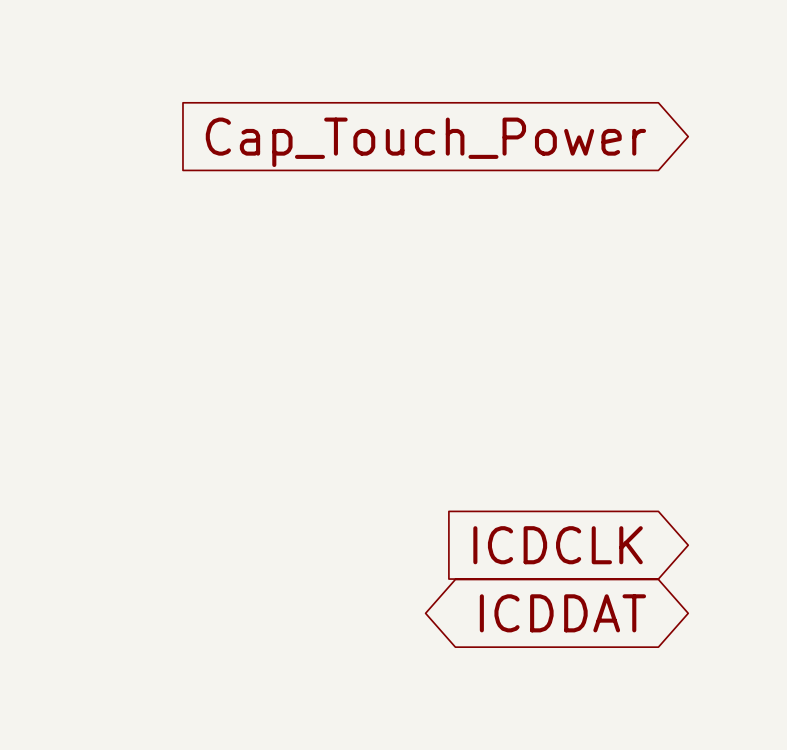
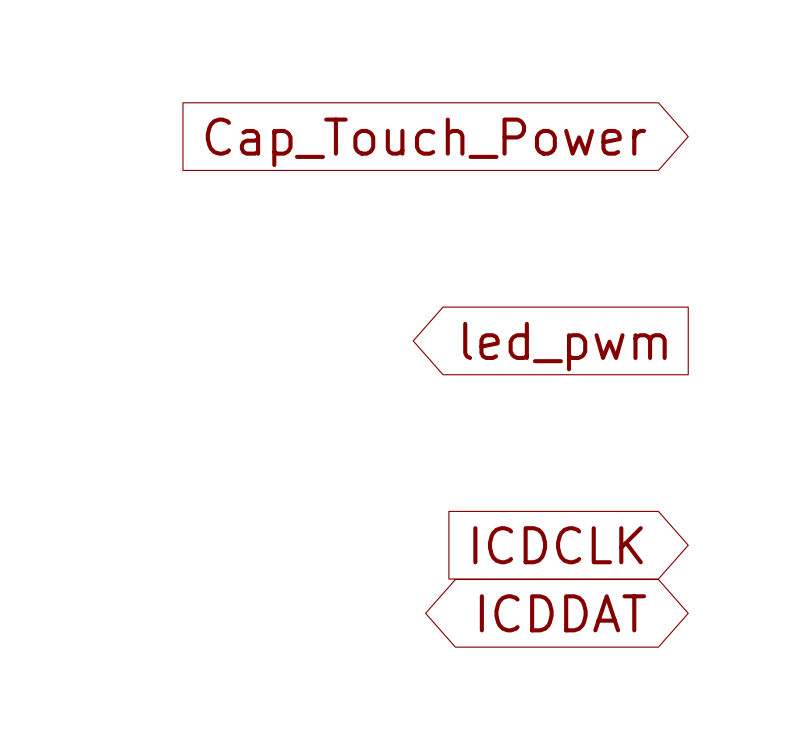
global label: none -> led_pwm (564, 346)

